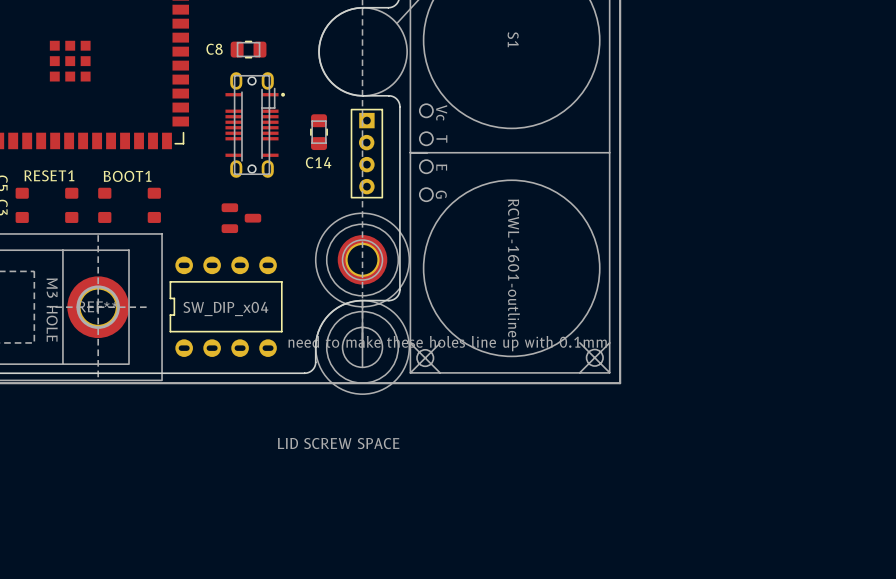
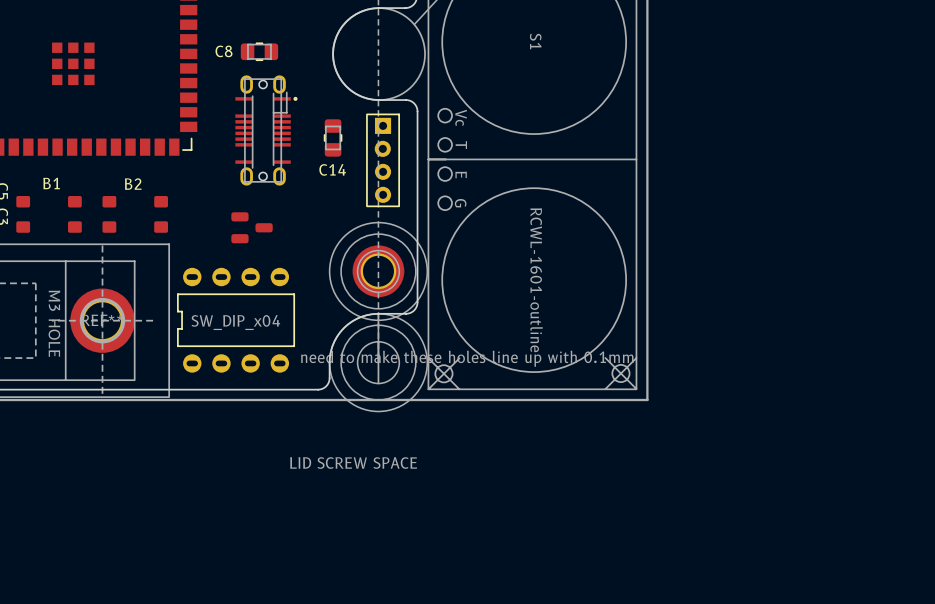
RESET1 name: RESET1 (49, 175) -> B1 (51, 183)
BOOT1 name: BOOT1 (127, 176) -> B2 (133, 184)

